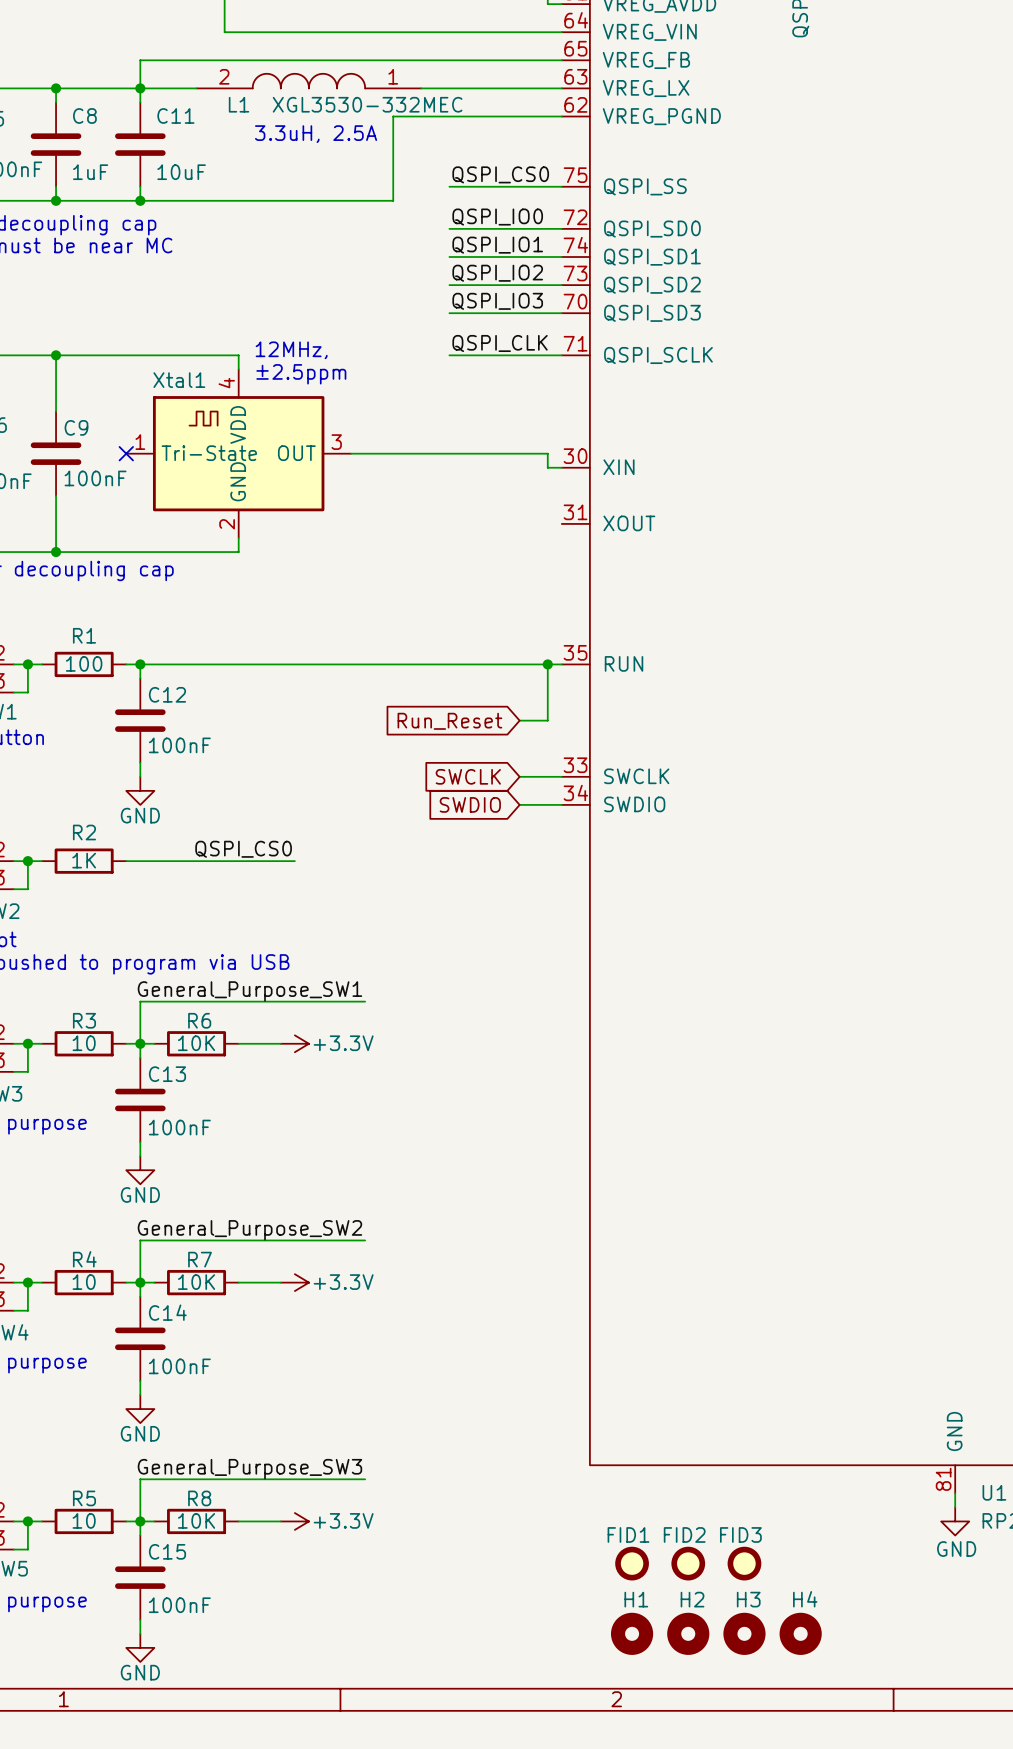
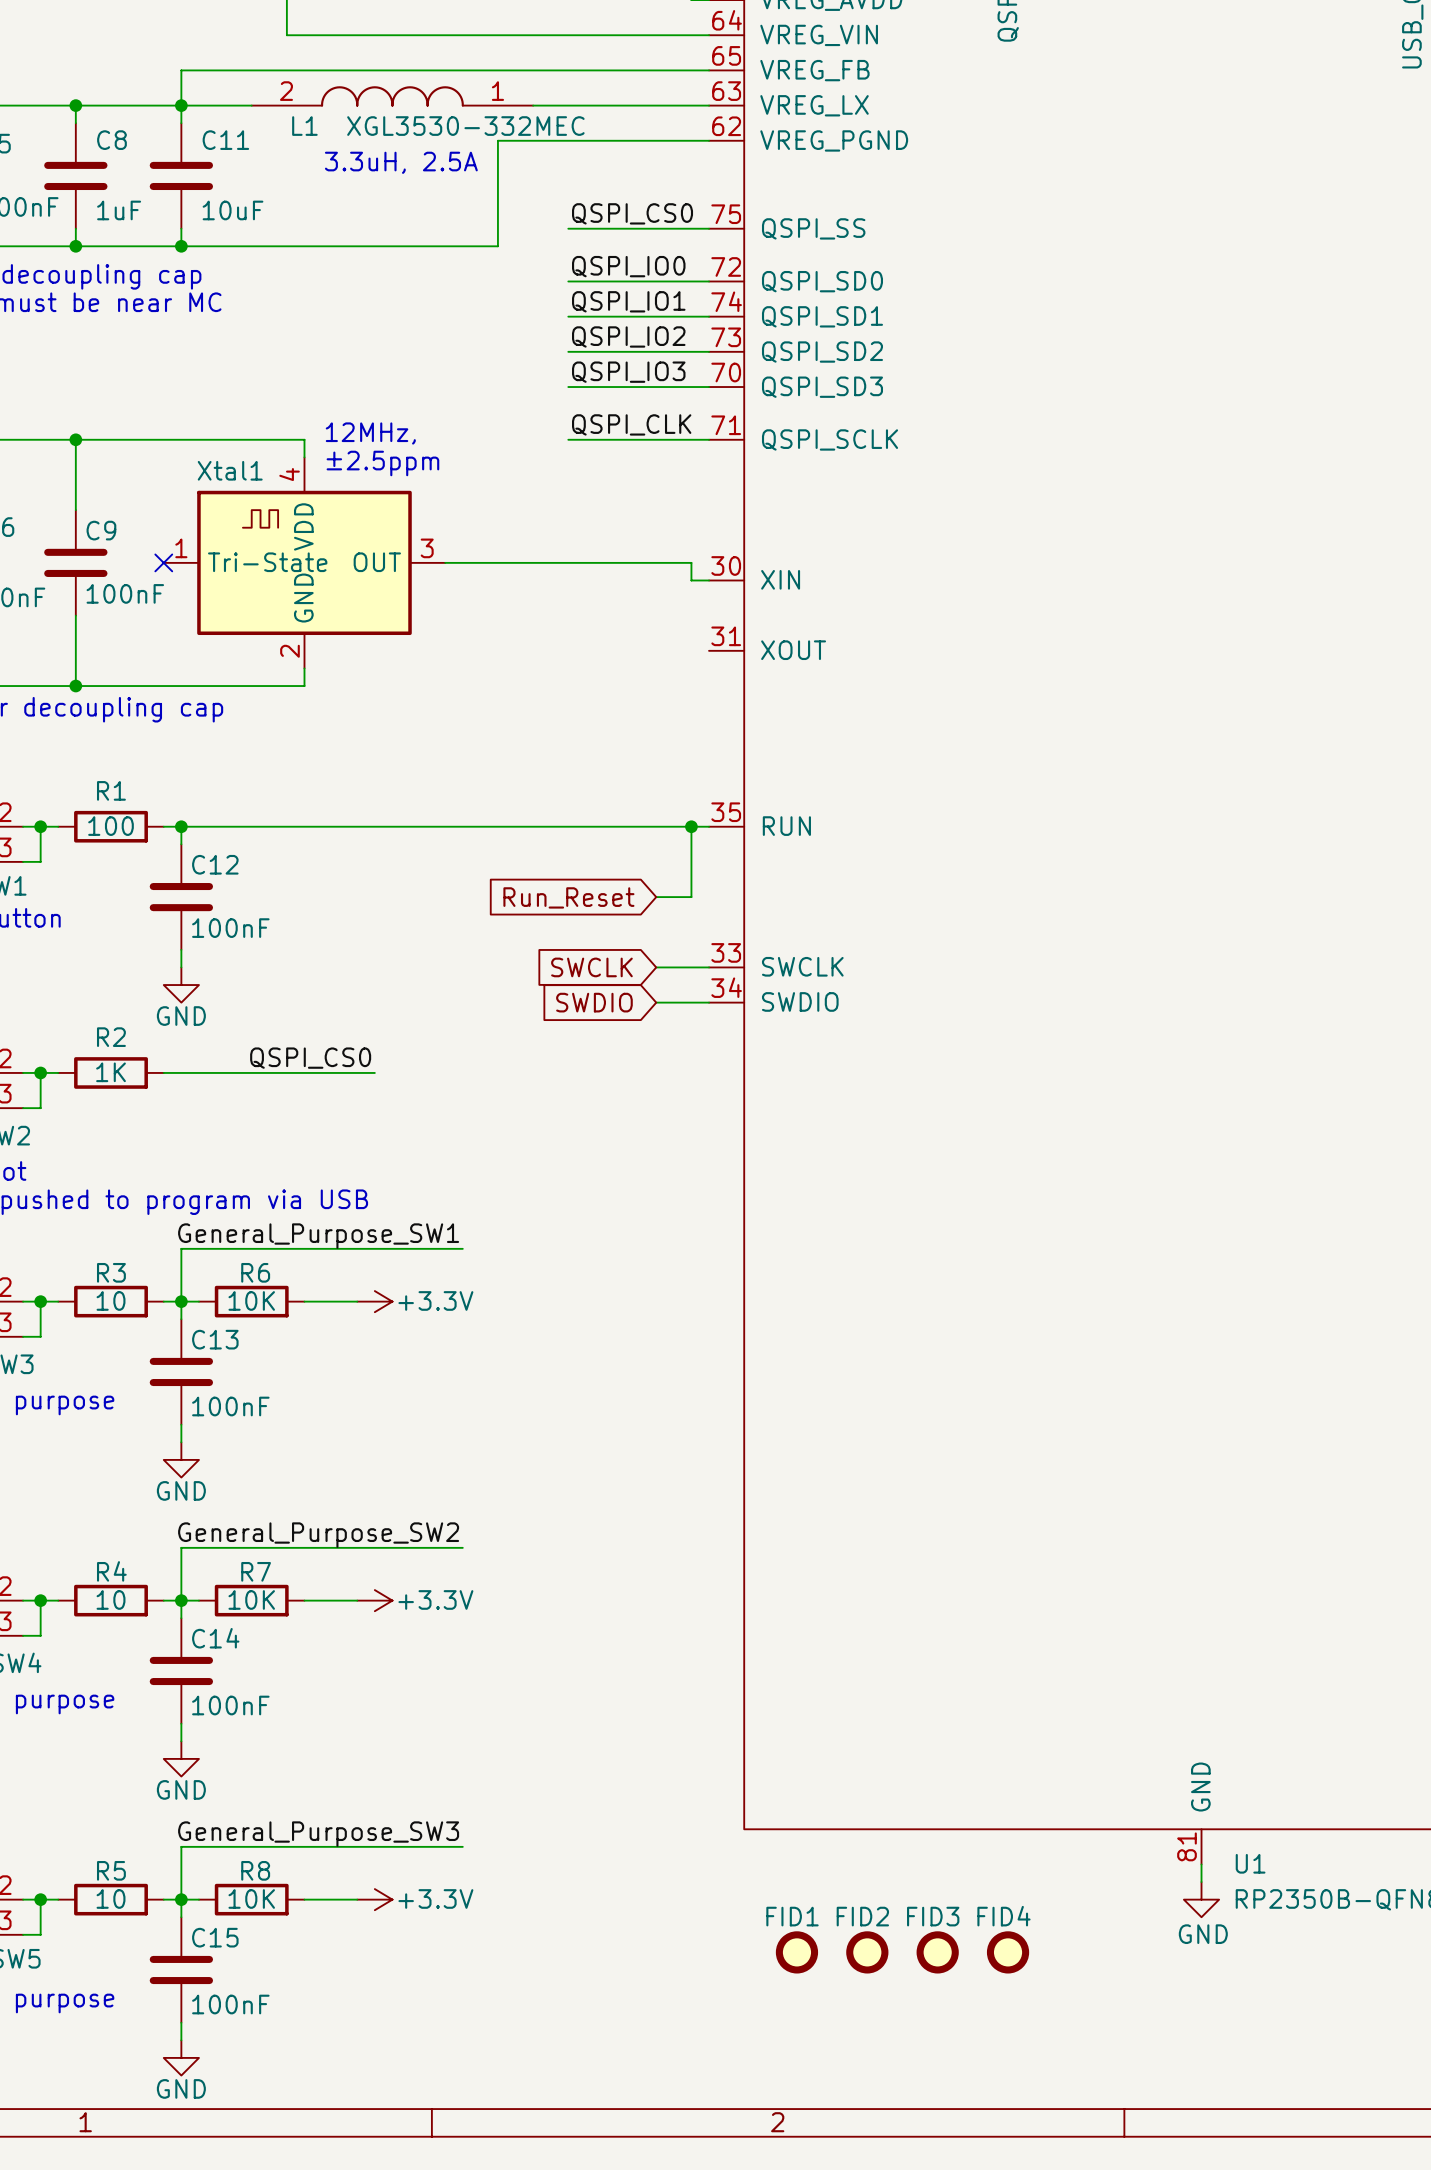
FID4: none -> (1008, 1952)
H1: (632, 1633) -> none
H2: (688, 1633) -> none
H3: (744, 1633) -> none
H4: (800, 1633) -> none

